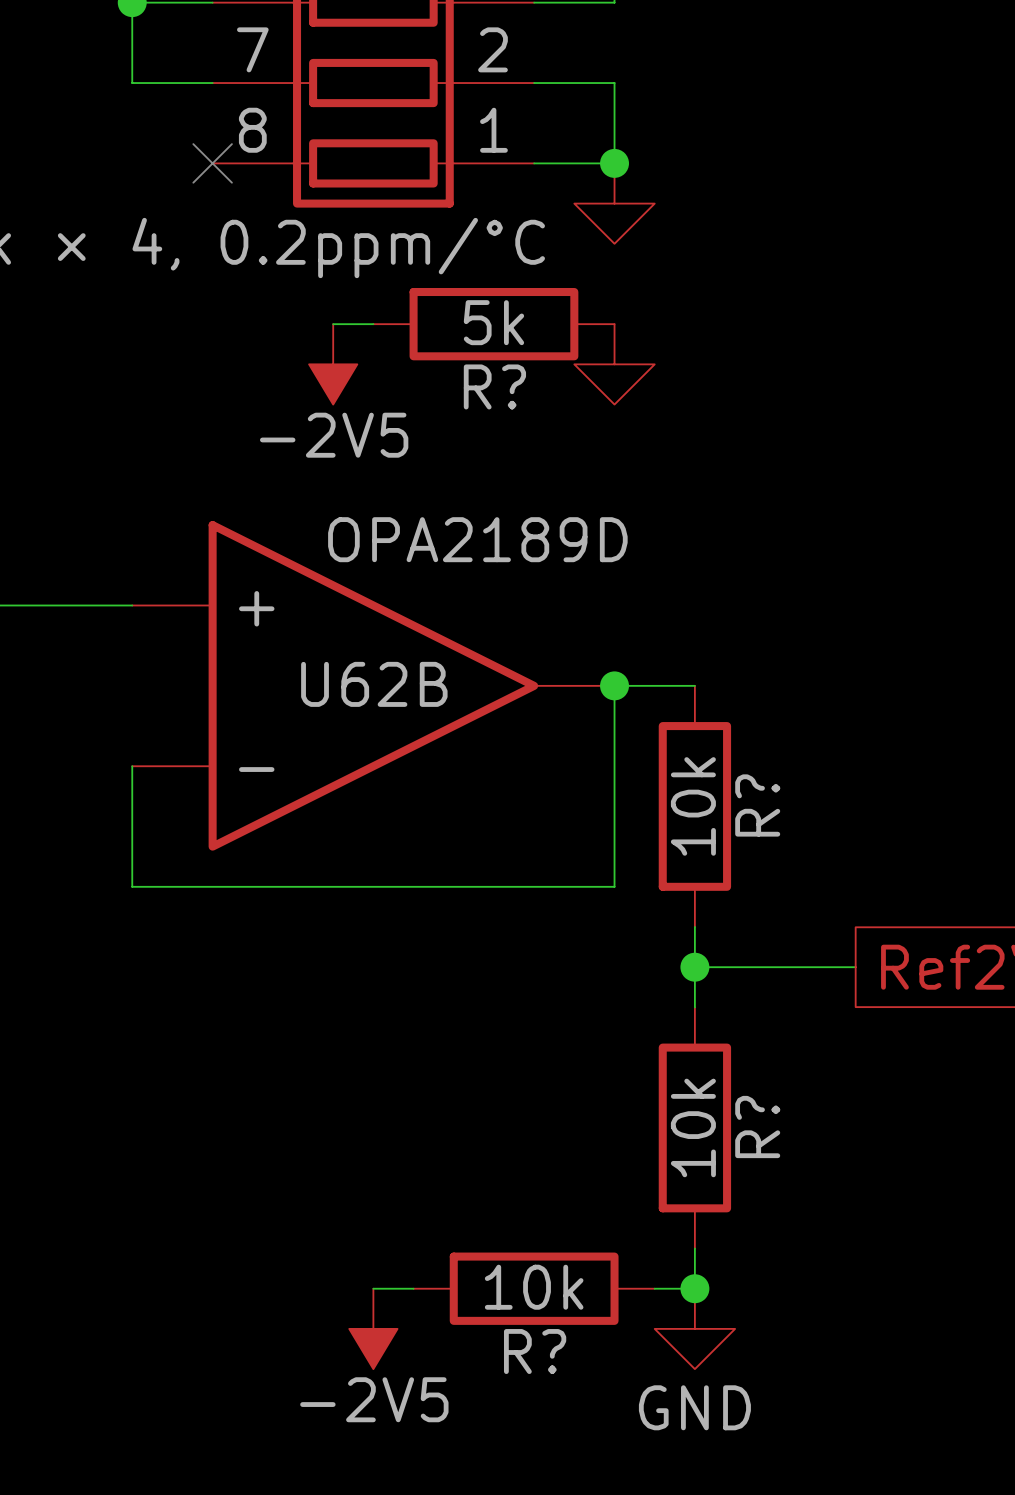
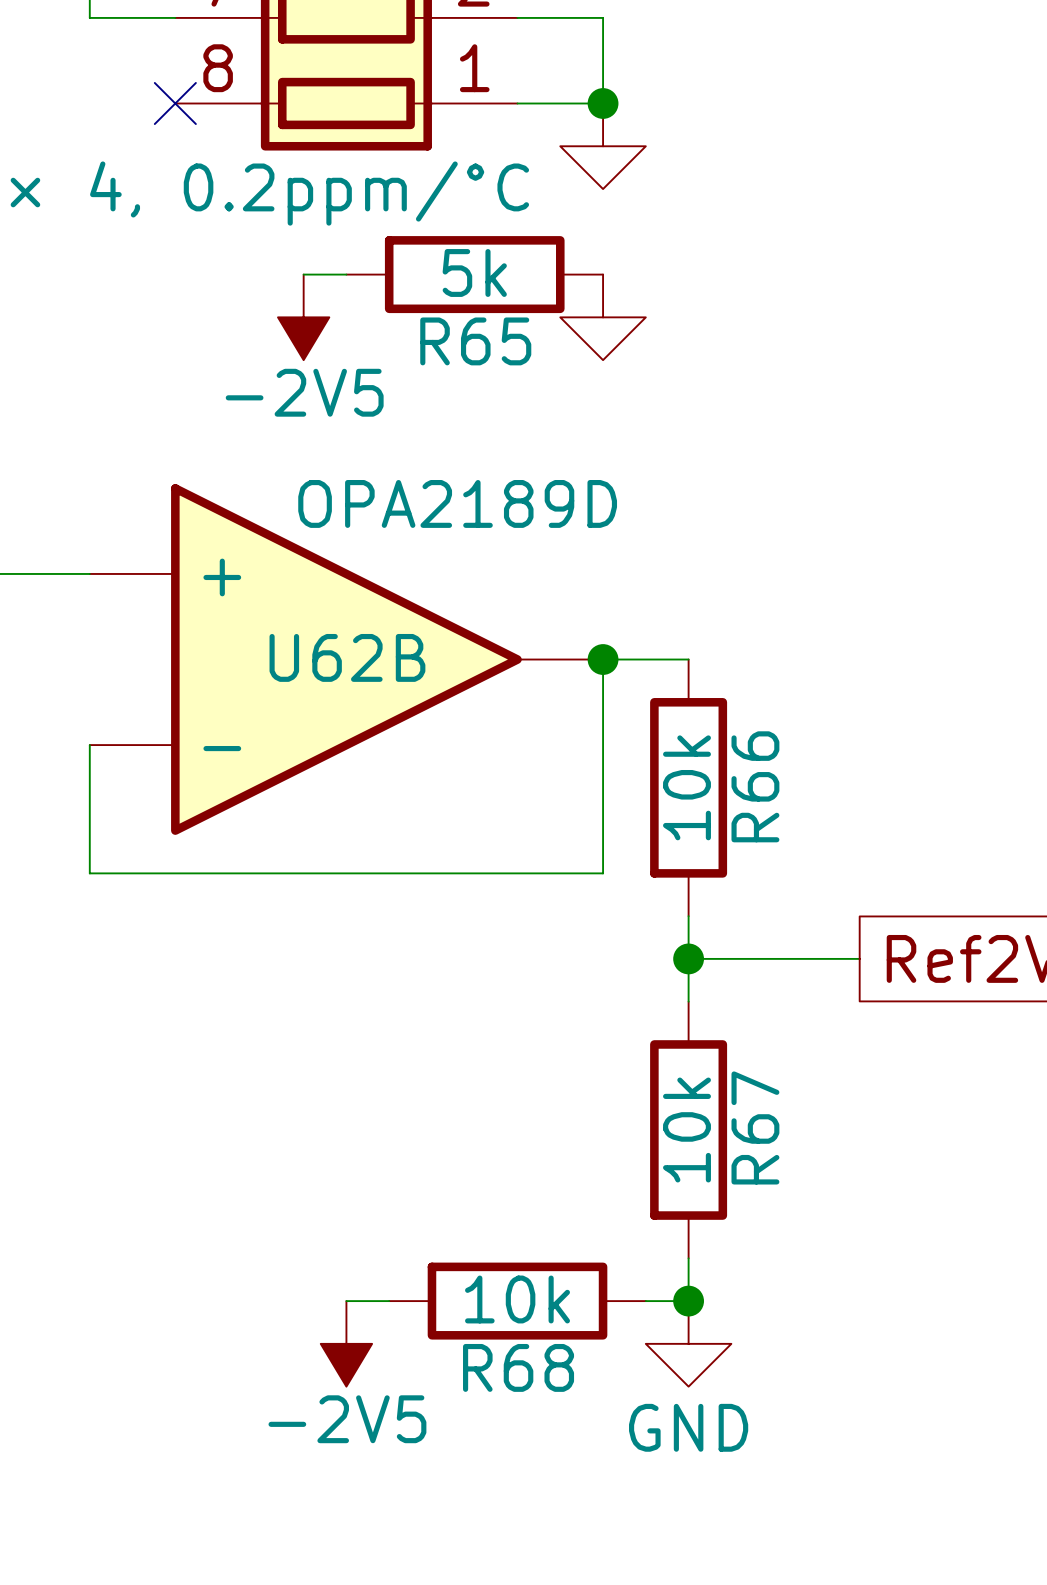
R? name: R? (494, 386) -> R65 (475, 341)
R? name: R? (757, 805) -> R66 (755, 786)
R? name: R? (757, 1127) -> R67 (755, 1127)
R? name: R? (535, 1351) -> R68 (518, 1367)

